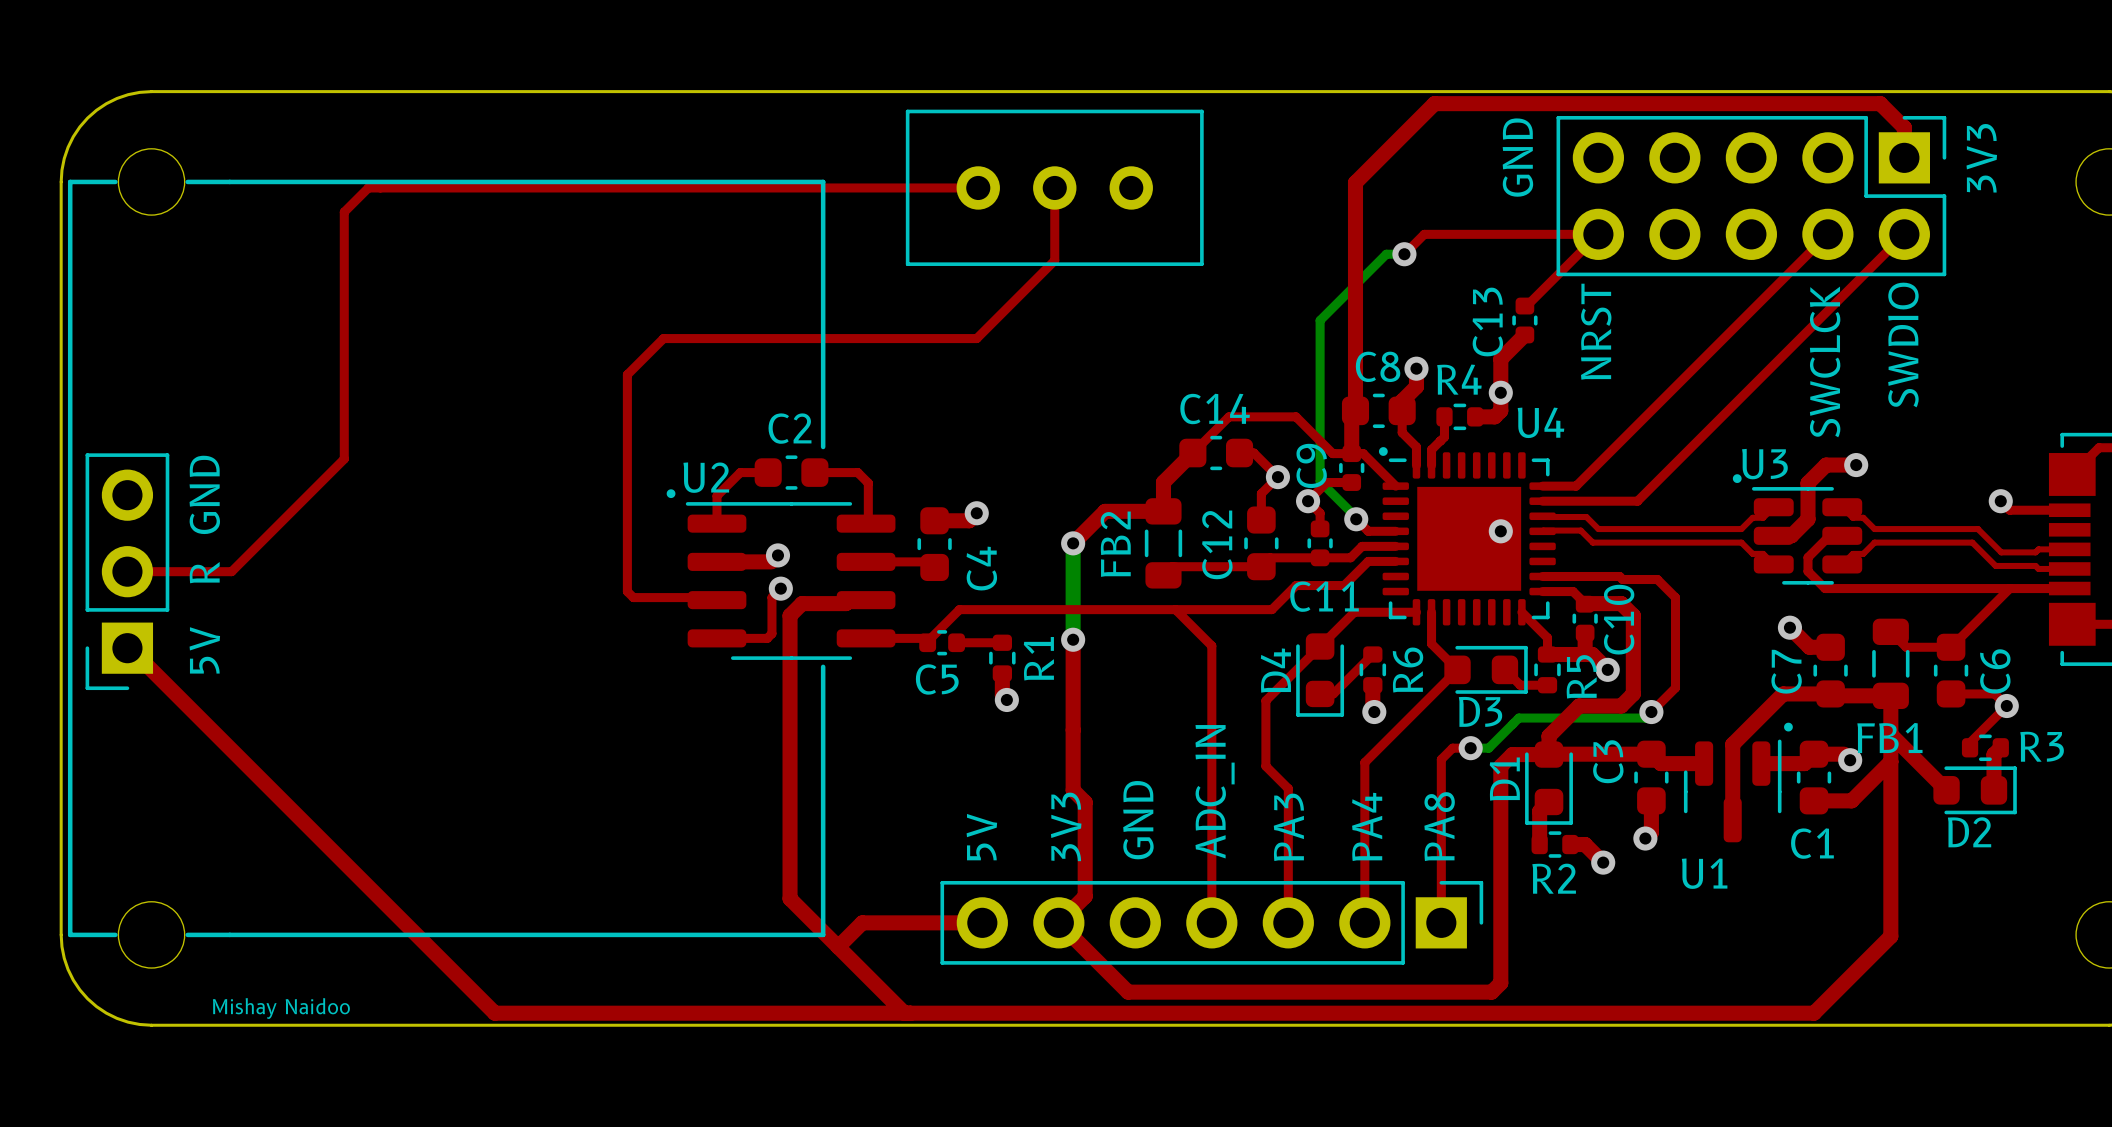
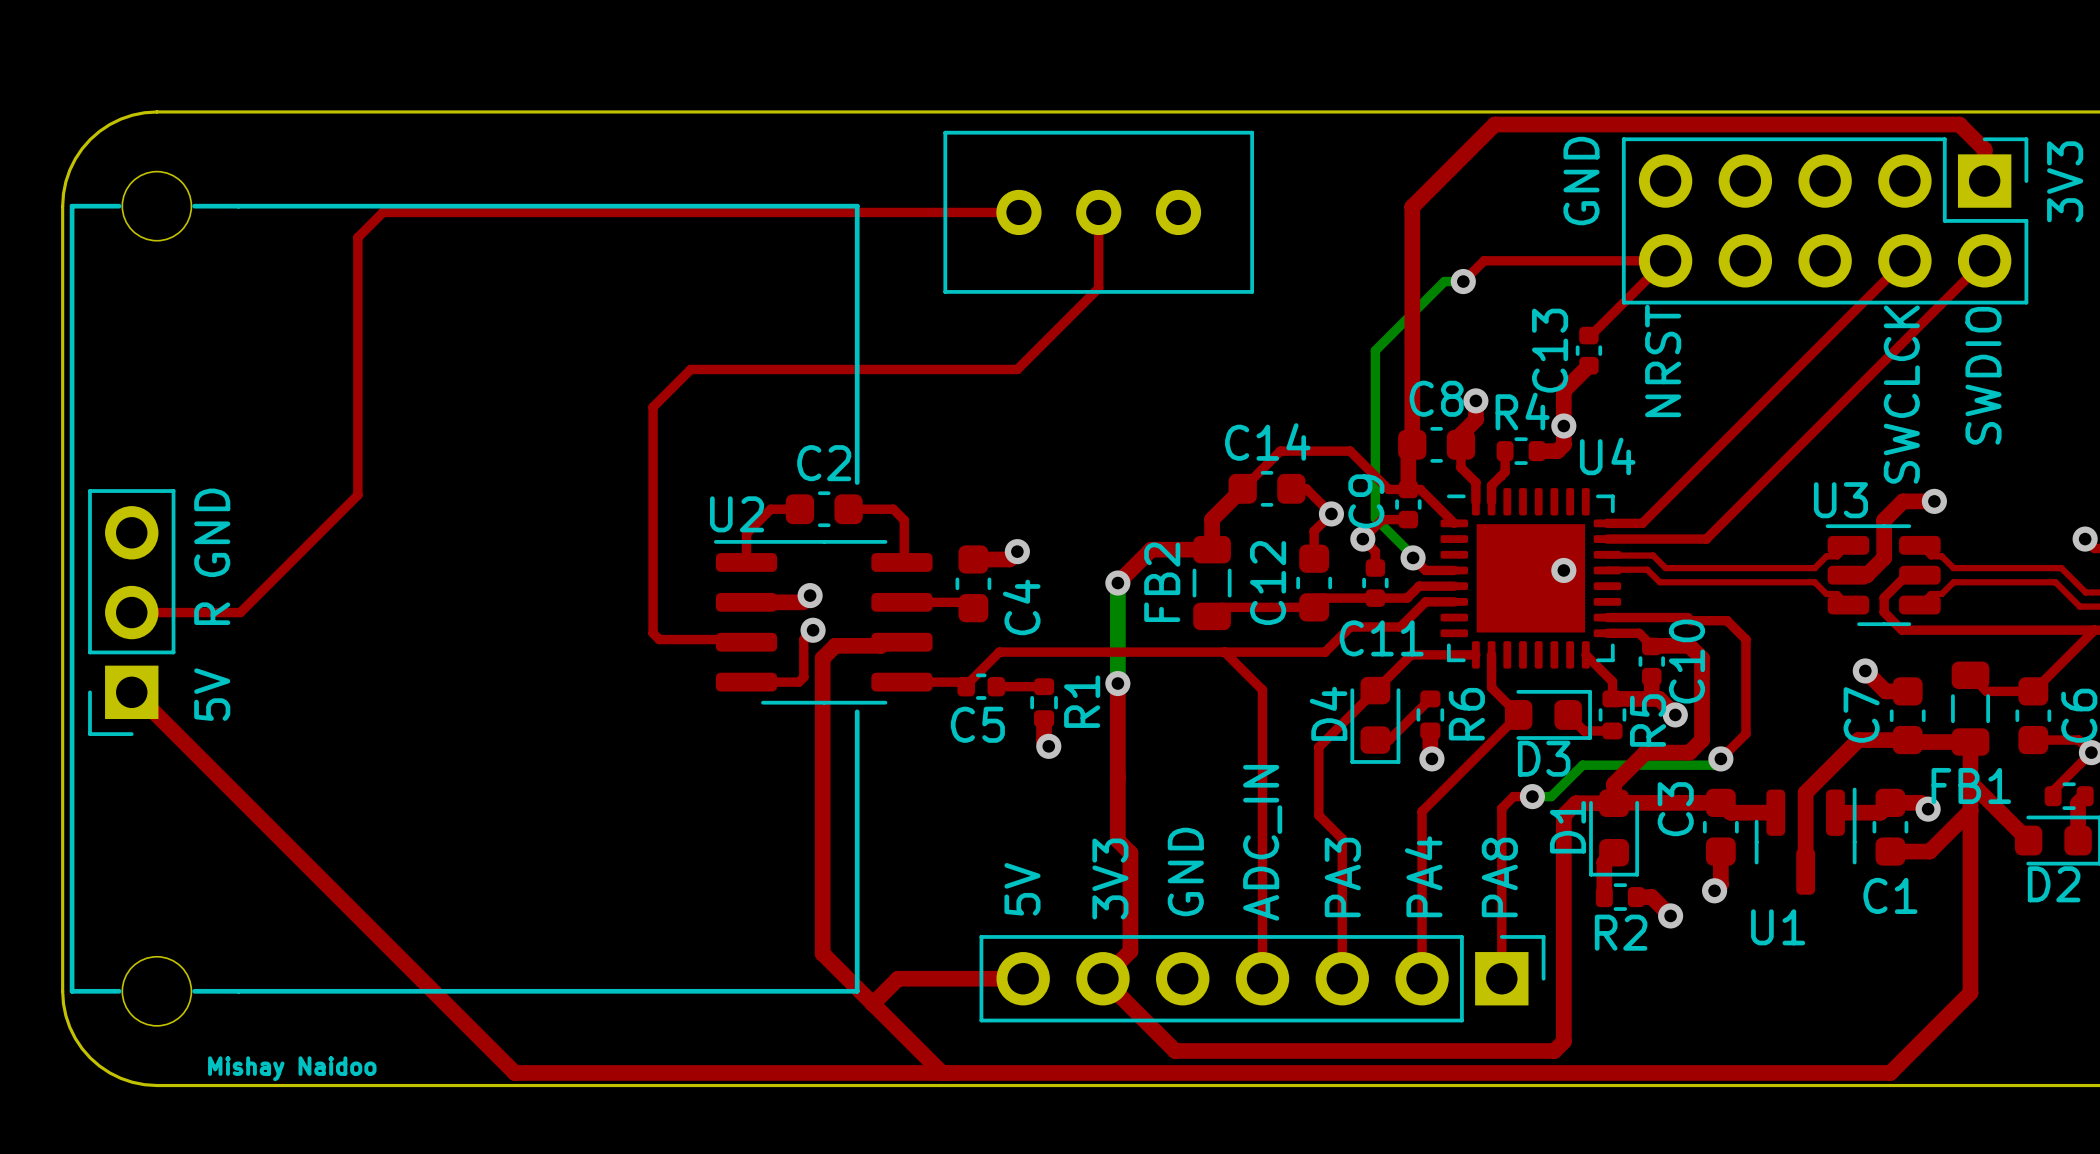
drawing: [1378, 447, 1388, 456] -> none
drawing: [1732, 474, 1742, 484] -> none
drawing: [666, 489, 676, 499] -> none
drawing: [1784, 722, 1793, 732] -> none

